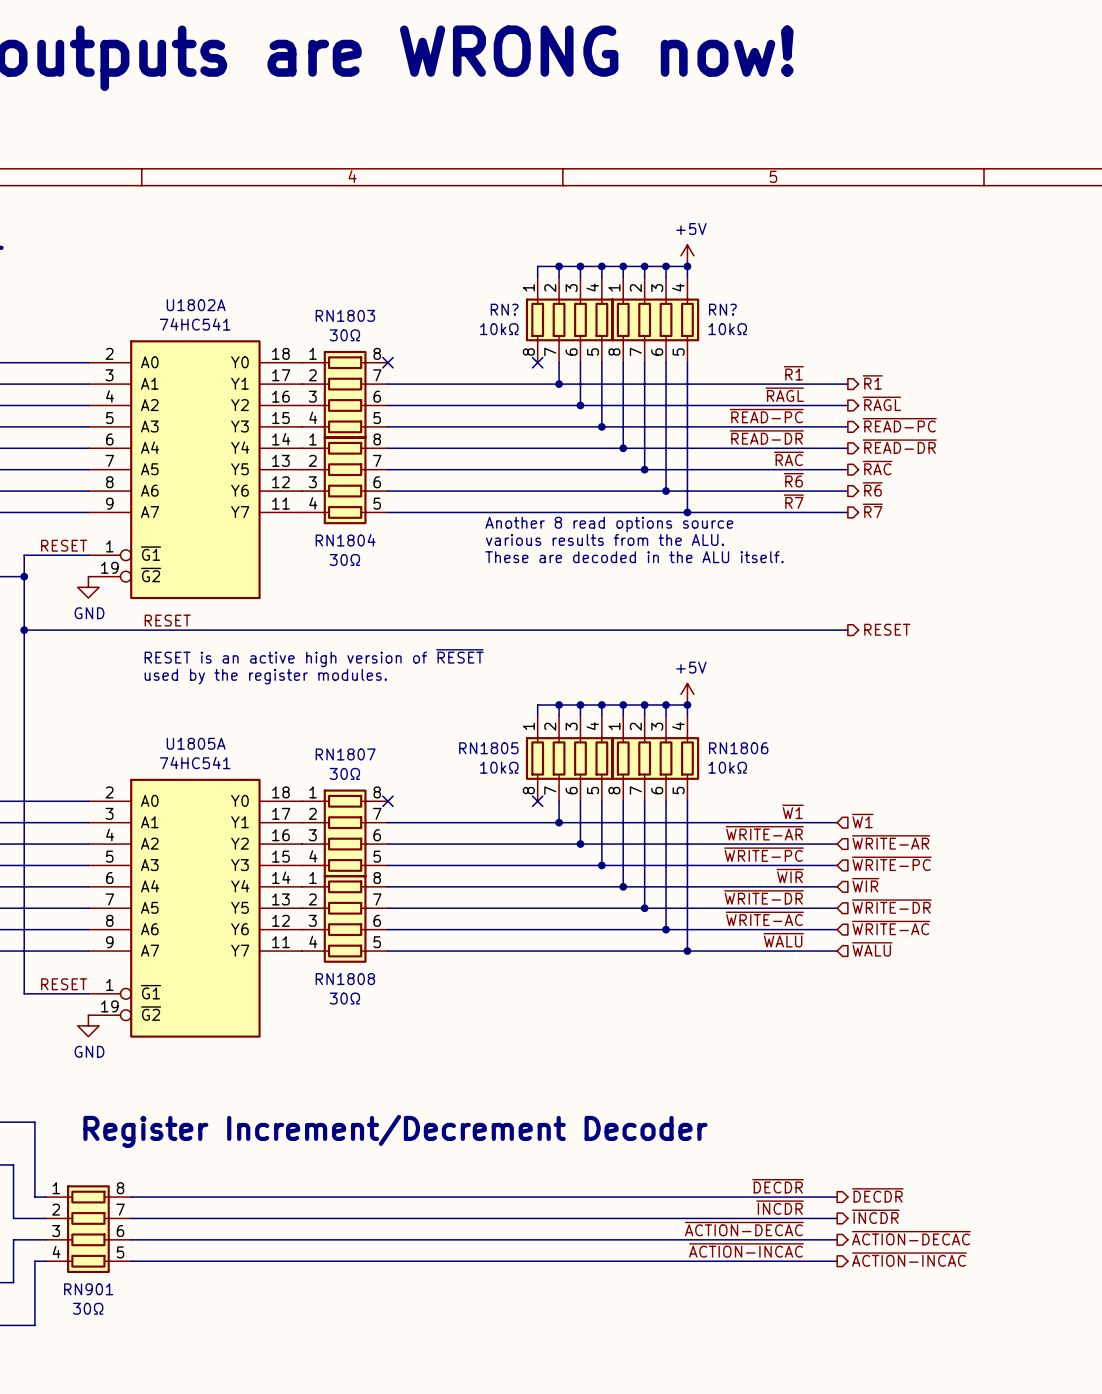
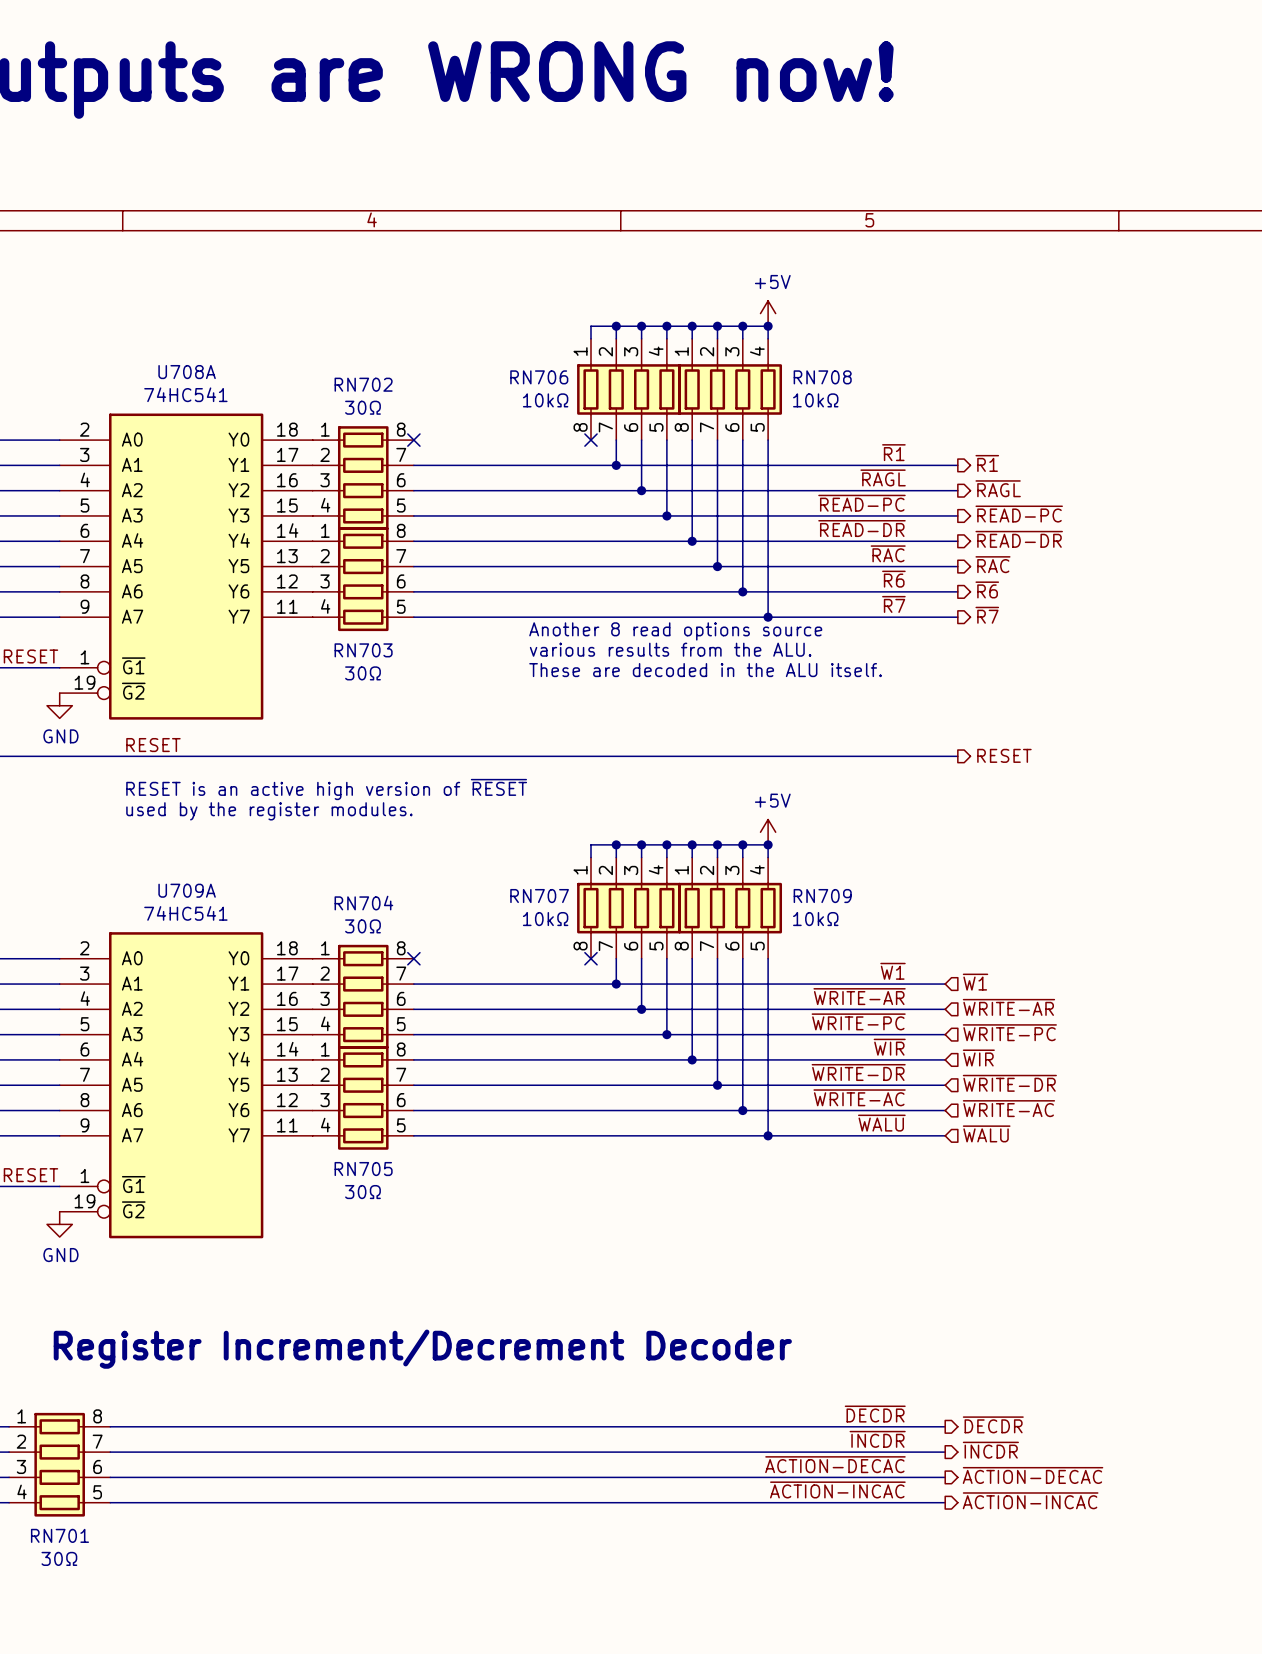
U1802A name: U1802A (196, 305) -> U708A (187, 372)
RN? name: RN? (504, 309) -> RN706 (539, 377)
RN? name: RN? (722, 309) -> RN708 (822, 377)
RN1803 name: RN1803 (345, 315) -> RN702 (363, 384)
RN1804 name: RN1804 (345, 540) -> RN703 (363, 650)
U1805A name: U1805A (196, 743) -> U709A (187, 890)
RN1805 name: RN1805 (488, 748) -> RN707 (539, 896)
RN1806 name: RN1806 (738, 748) -> RN709 (822, 896)
RN1807 name: RN1807 (345, 754) -> RN704 (363, 903)
RN1808 name: RN1808 (345, 979) -> RN705 (363, 1169)
RN901 name: RN901 (88, 1289) -> RN701 (59, 1535)

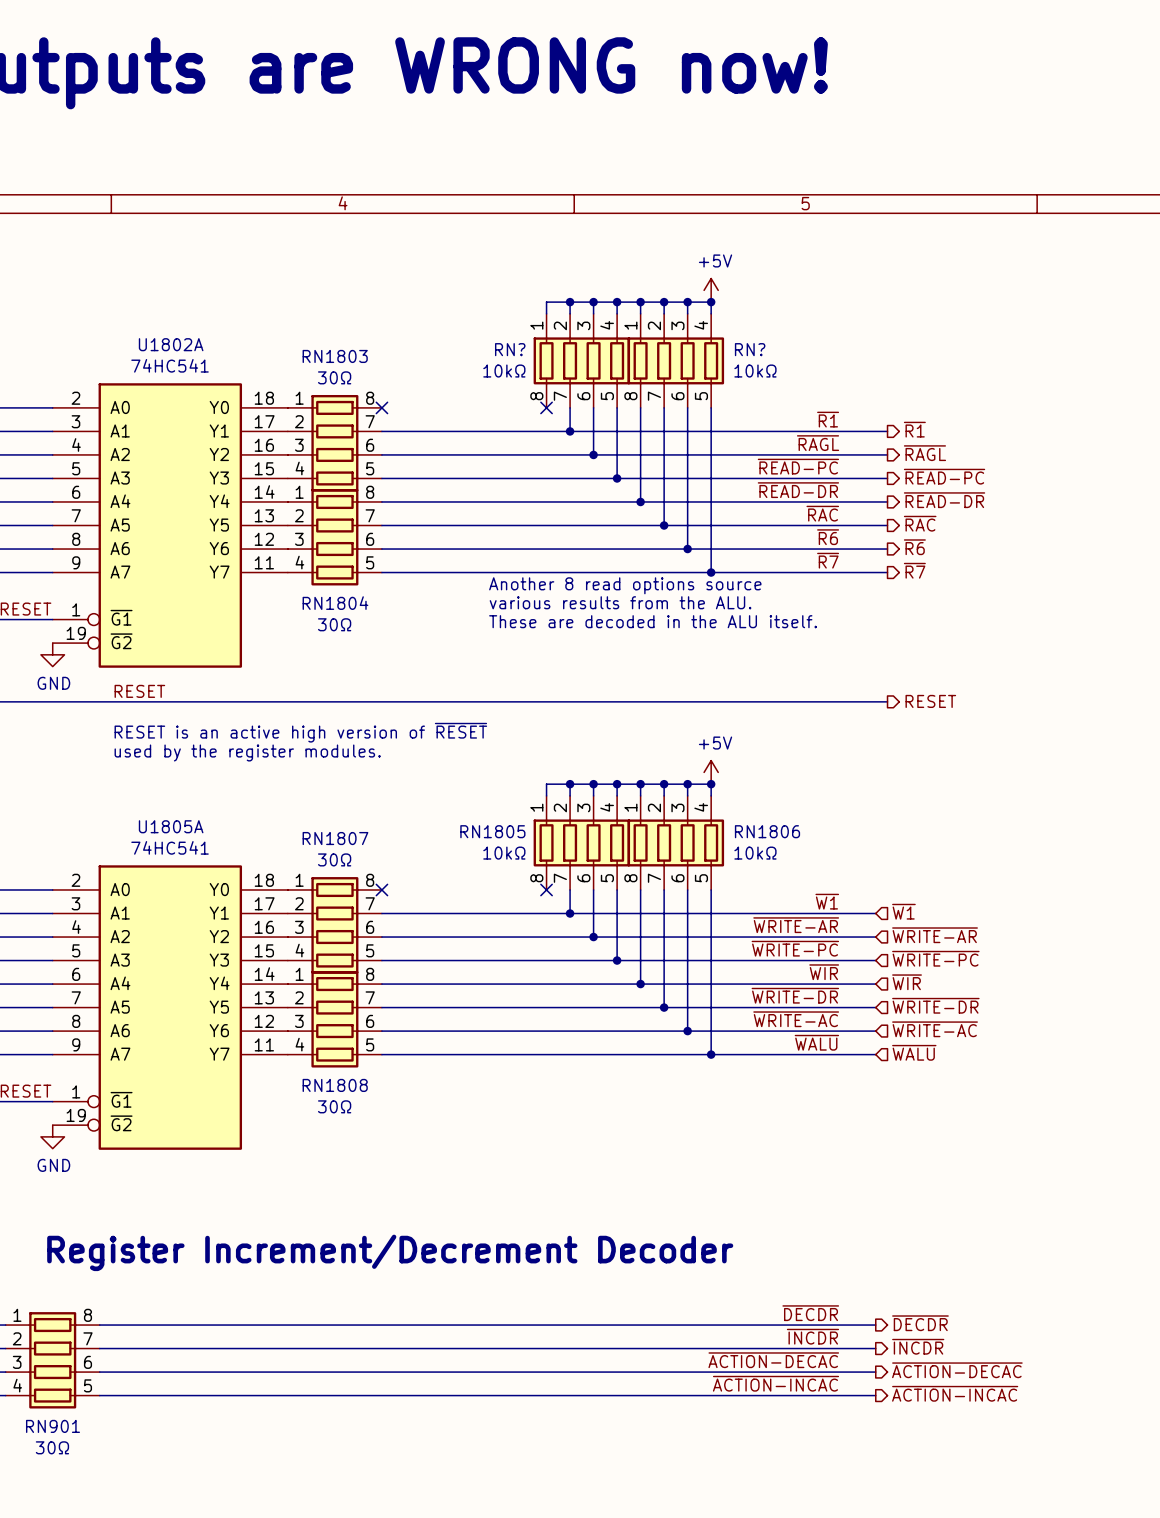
U708A name: U708A (187, 372) -> U1802A (171, 344)
RN706 name: RN706 (539, 377) -> RN? (510, 349)
RN708 name: RN708 (822, 377) -> RN? (750, 349)
RN702 name: RN702 (363, 384) -> RN1803 (335, 356)
RN703 name: RN703 (363, 650) -> RN1804 (335, 603)
U709A name: U709A (187, 890) -> U1805A (171, 826)
RN707 name: RN707 (539, 896) -> RN1805 (492, 831)
RN709 name: RN709 (822, 896) -> RN1806 (767, 831)
RN704 name: RN704 (363, 903) -> RN1807 (335, 838)
RN705 name: RN705 (363, 1169) -> RN1808 (335, 1085)
RN701 name: RN701 (59, 1535) -> RN901 (53, 1426)

